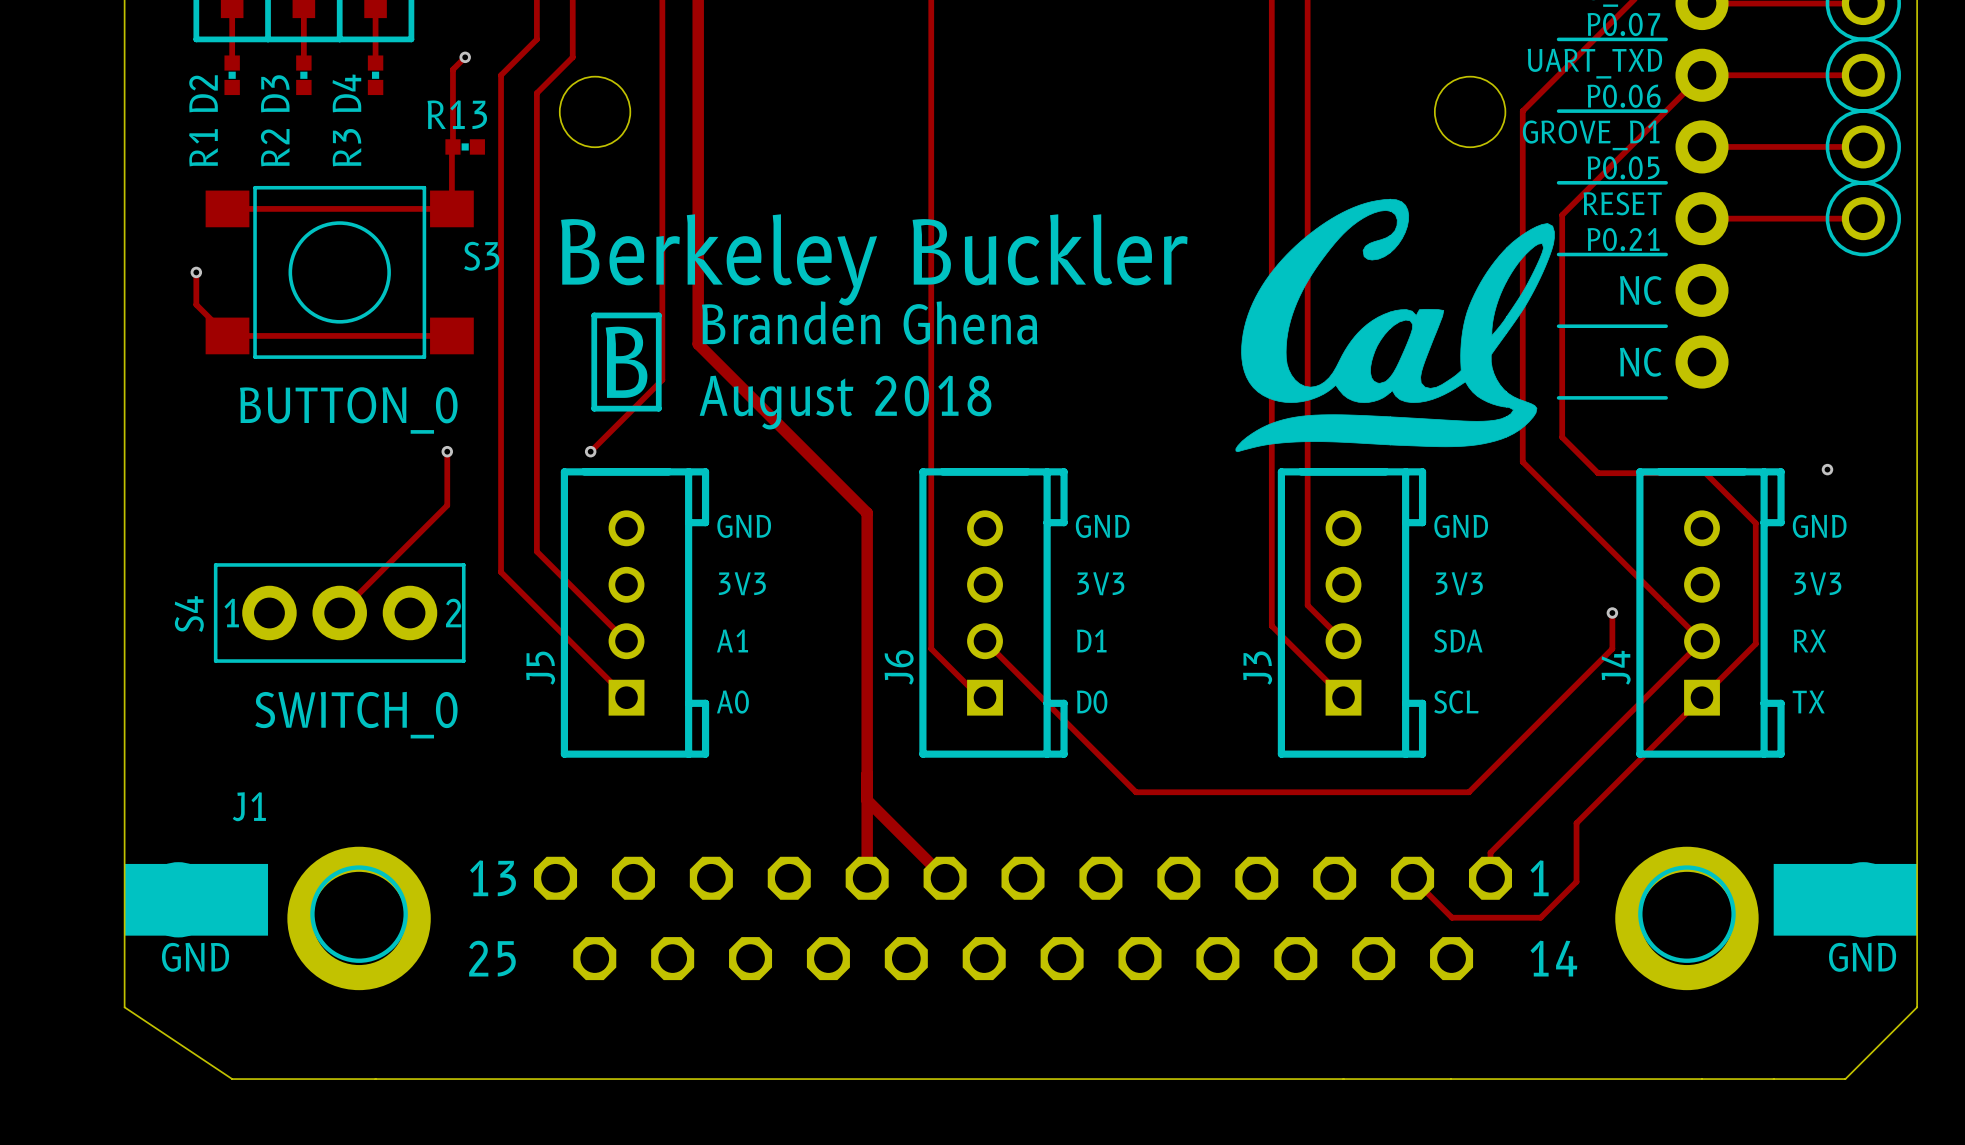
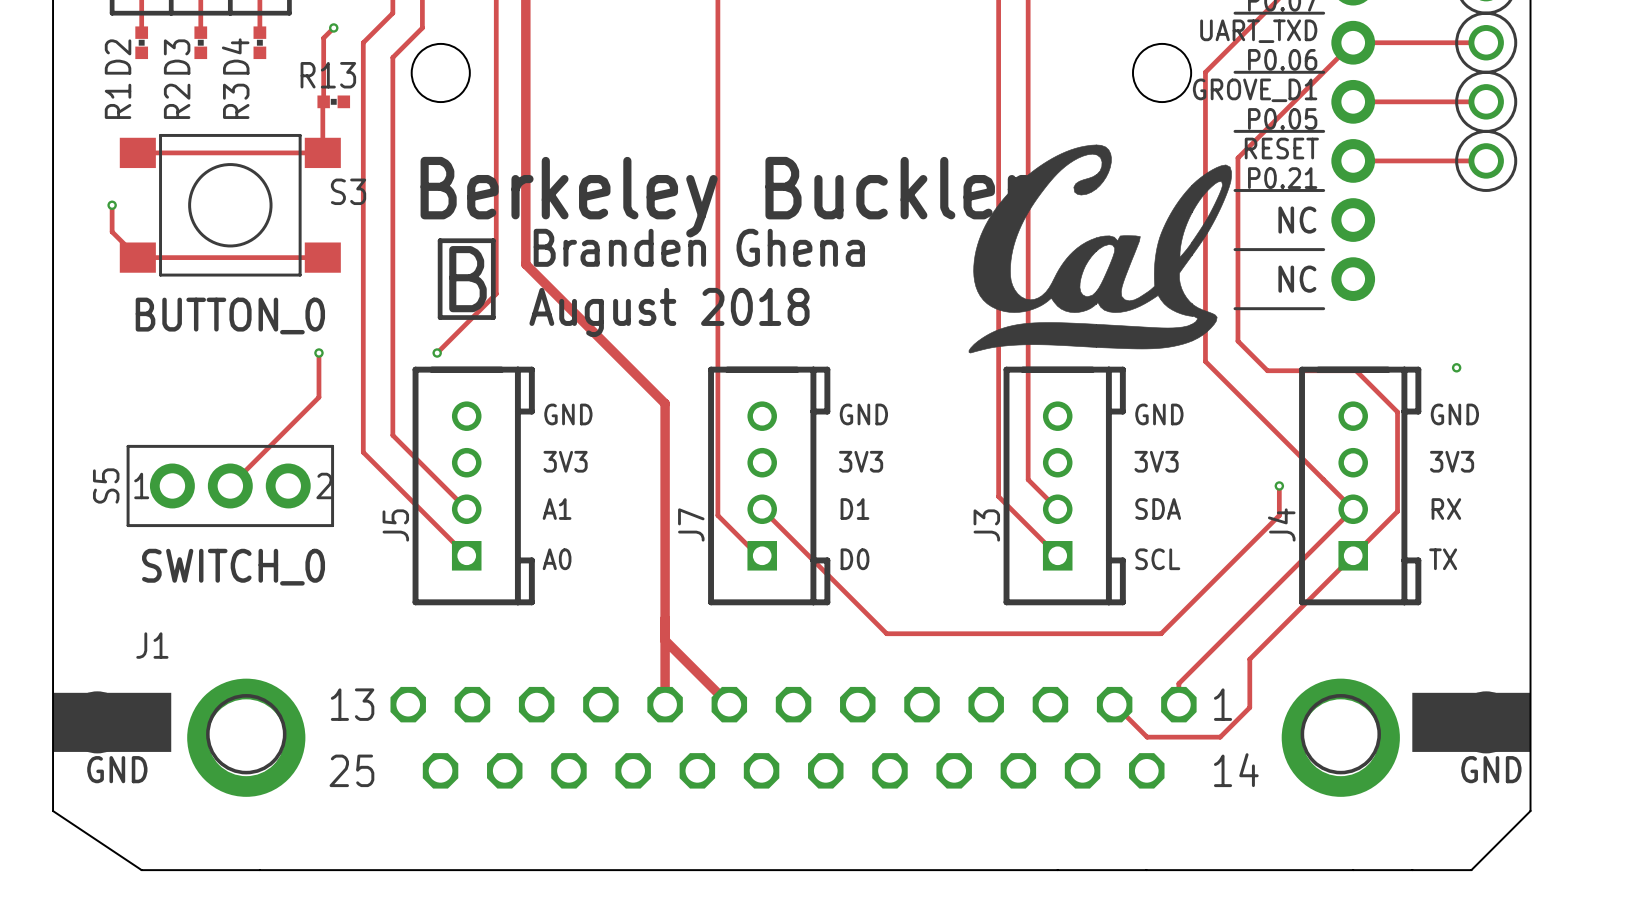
S4 name: S4 (189, 614) -> S5 (106, 485)
J6 name: J6 (899, 667) -> J7 (691, 524)

